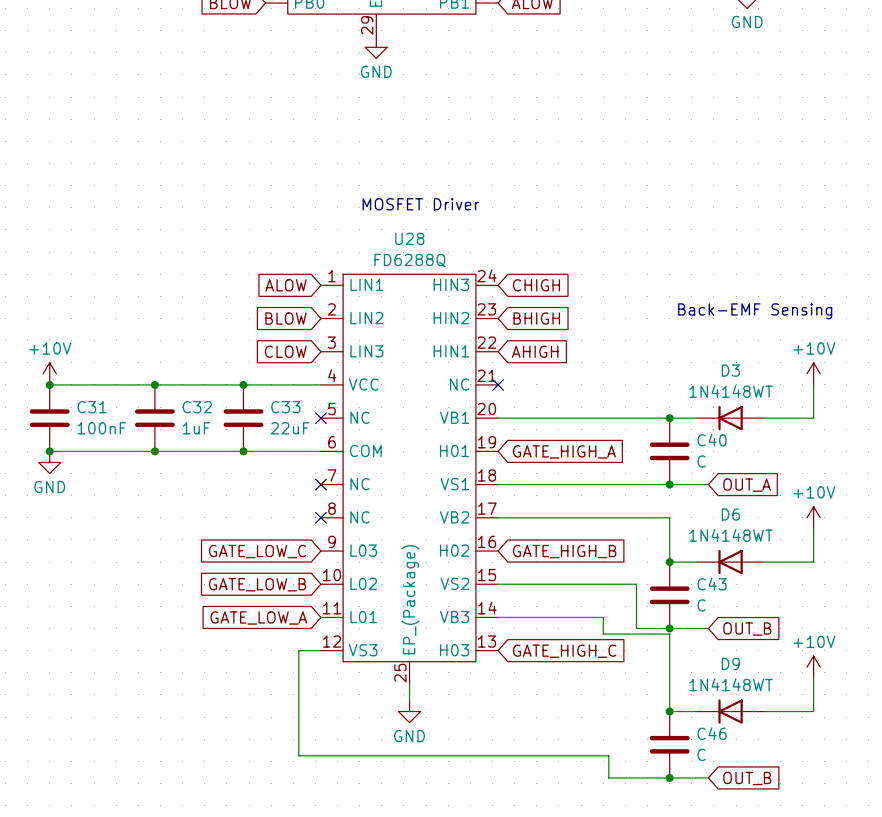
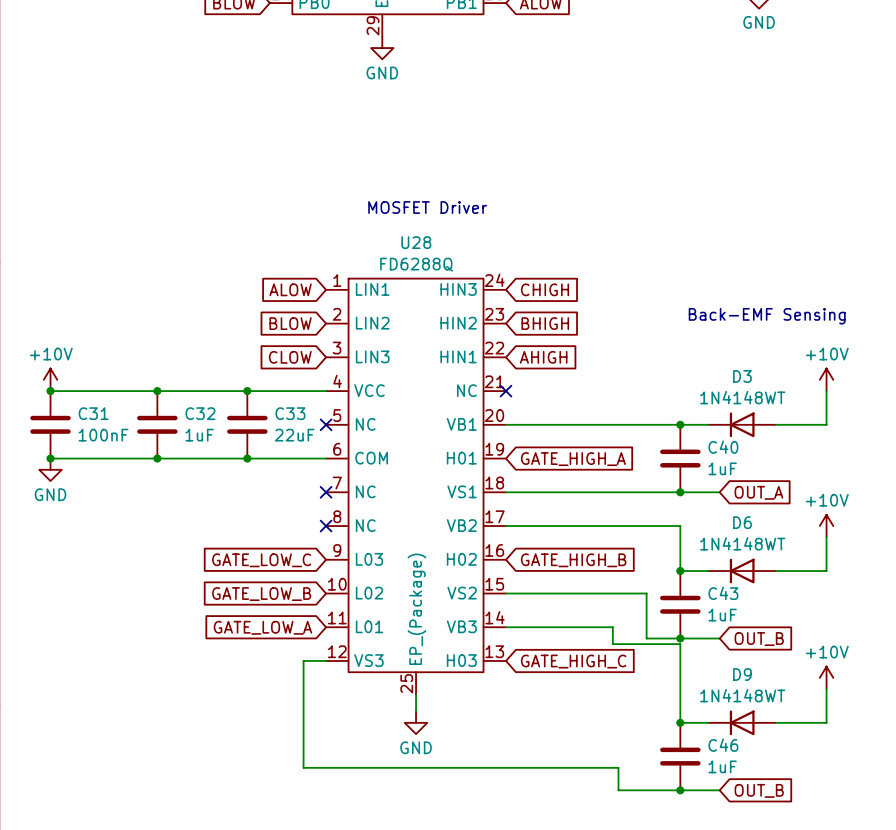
C40 value: C (701, 461) -> 1uF (722, 468)
C43 value: C (701, 605) -> 1uF (722, 615)
C46 value: C (701, 754) -> 1uF (722, 766)

